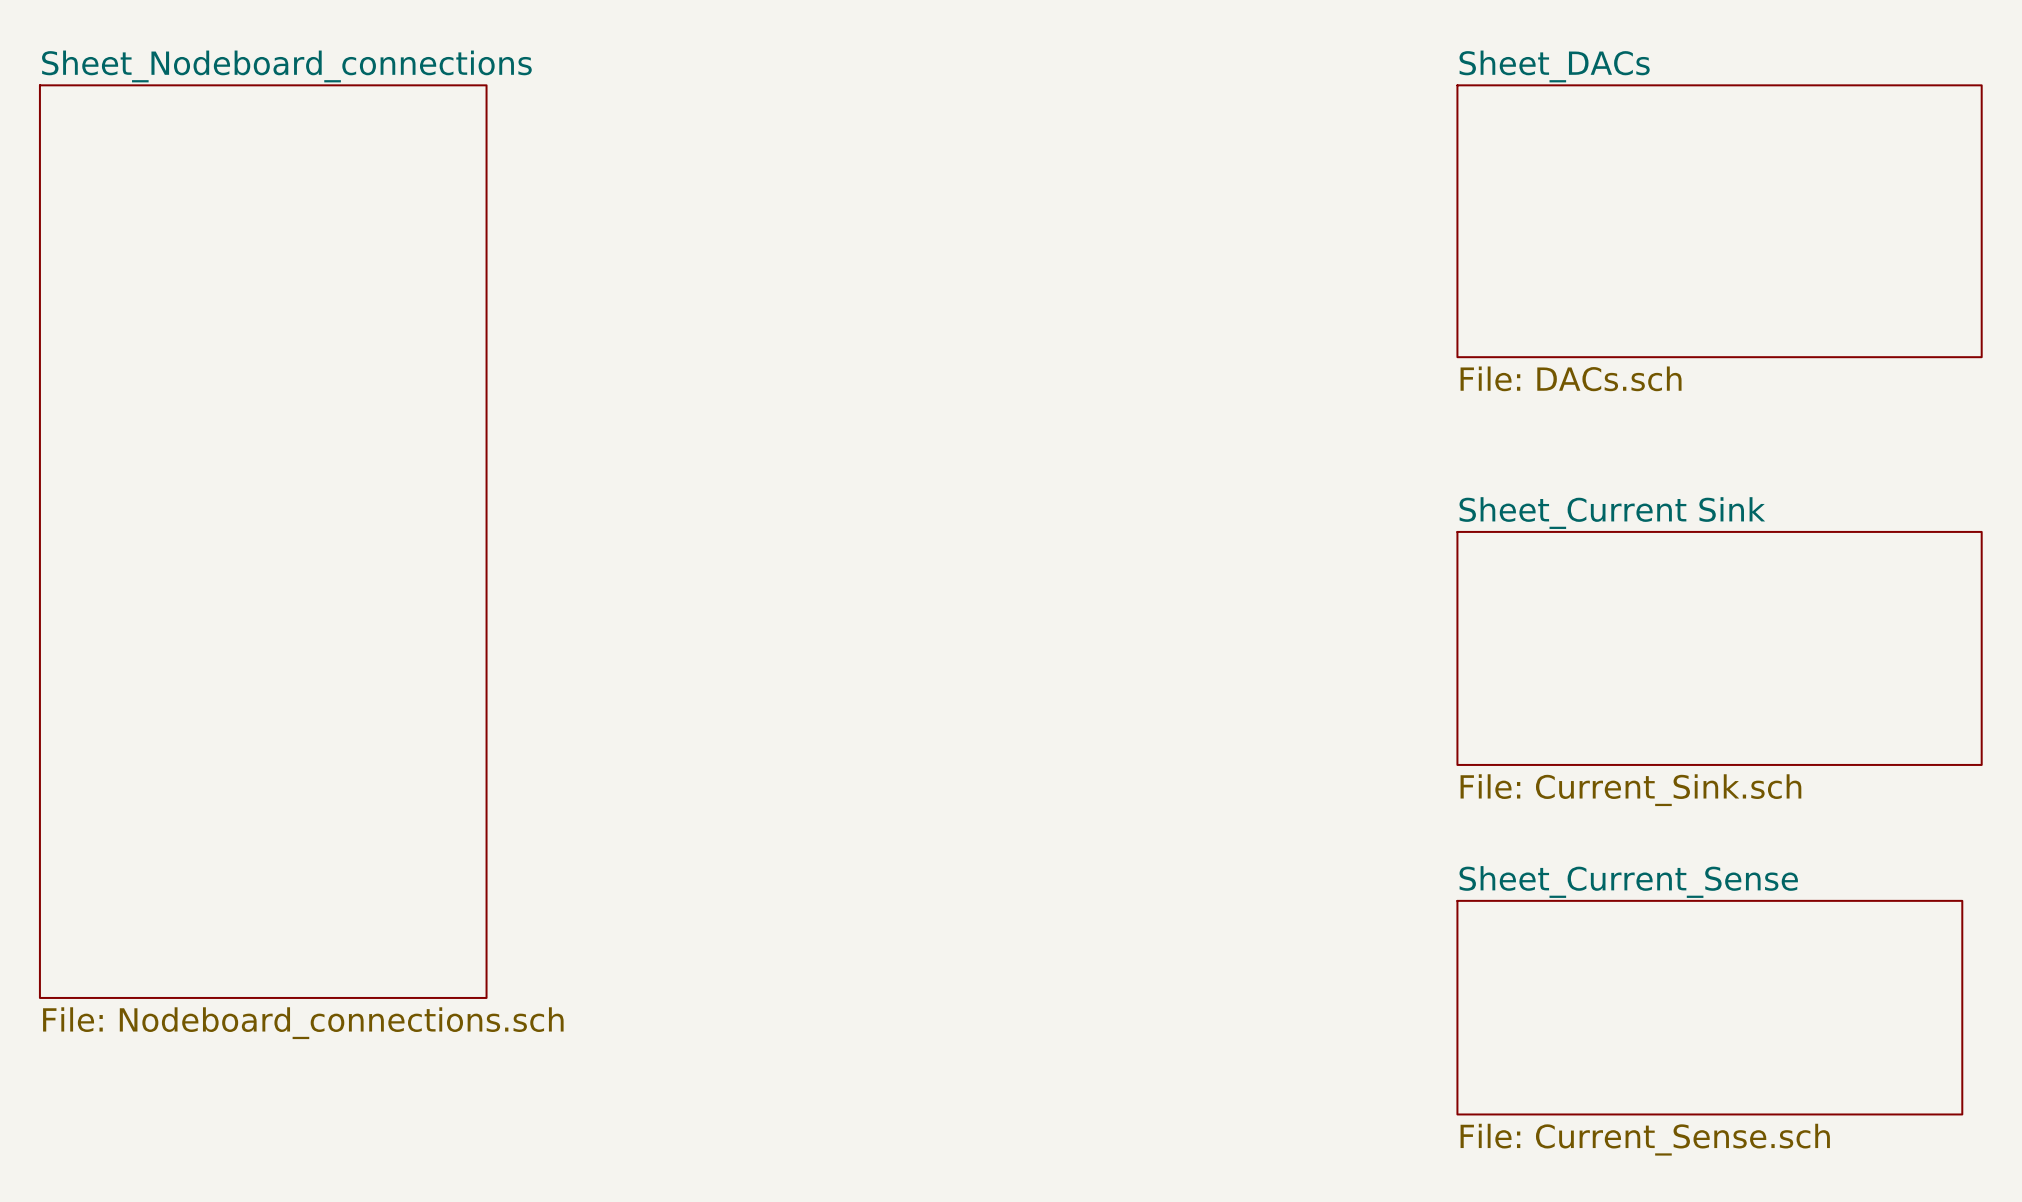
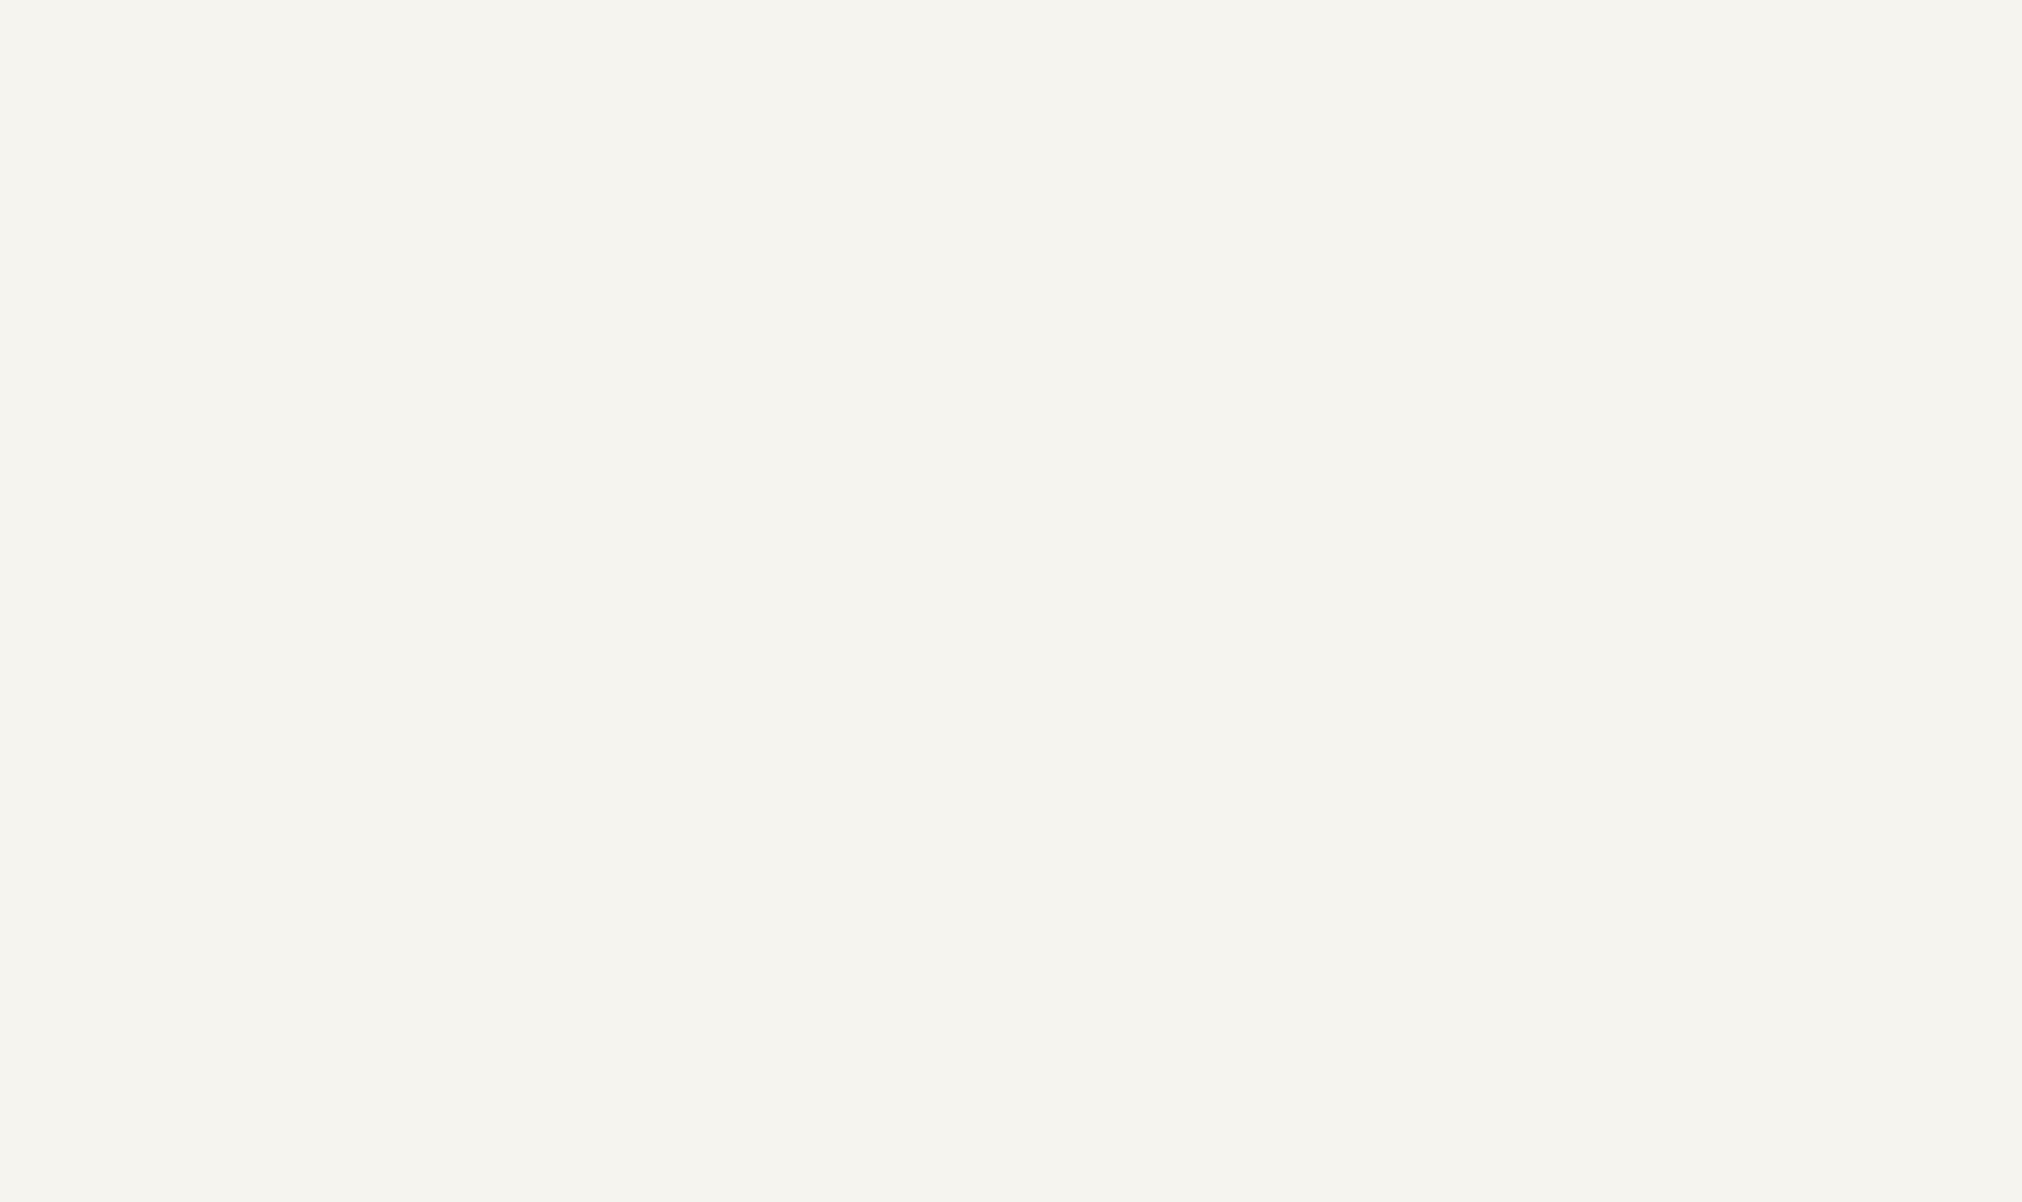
sheet Sheet_DACs: File: DACs.sch (1719, 221) -> none
sheet Sheet_Nodeboard_connections: File: Nodeboard_connections.sch (263, 541) -> none
sheet Sheet_Current Sink: File: Current_Sink.sch (1719, 648) -> none
sheet Sheet_Current_Sense: File: Current_Sense.sch (1709, 1007) -> none

